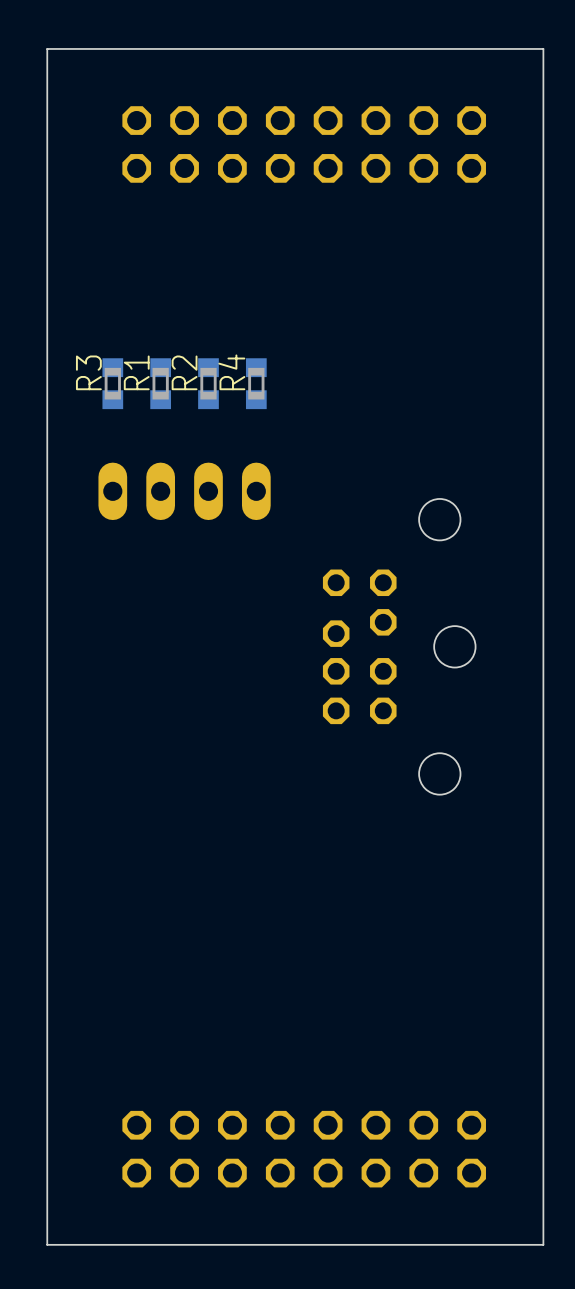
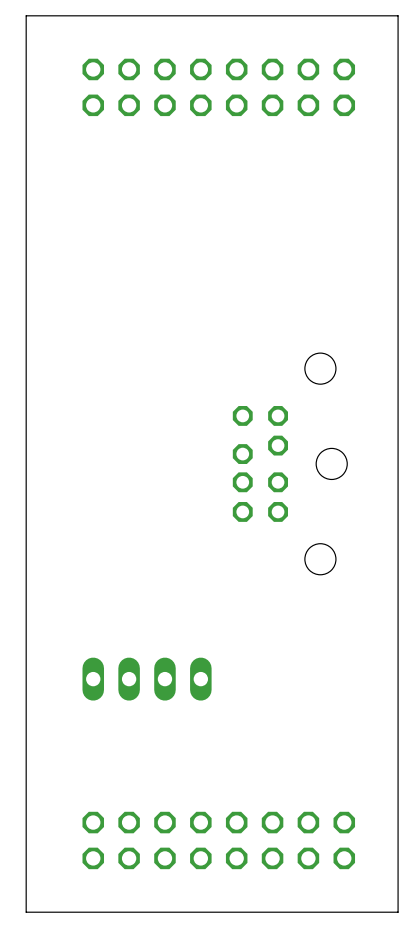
R3: (112, 383) -> none
R1: (160, 383) -> none
R2: (208, 383) -> none
R4: (256, 383) -> none
part position: (184, 491) -> (147, 679)

